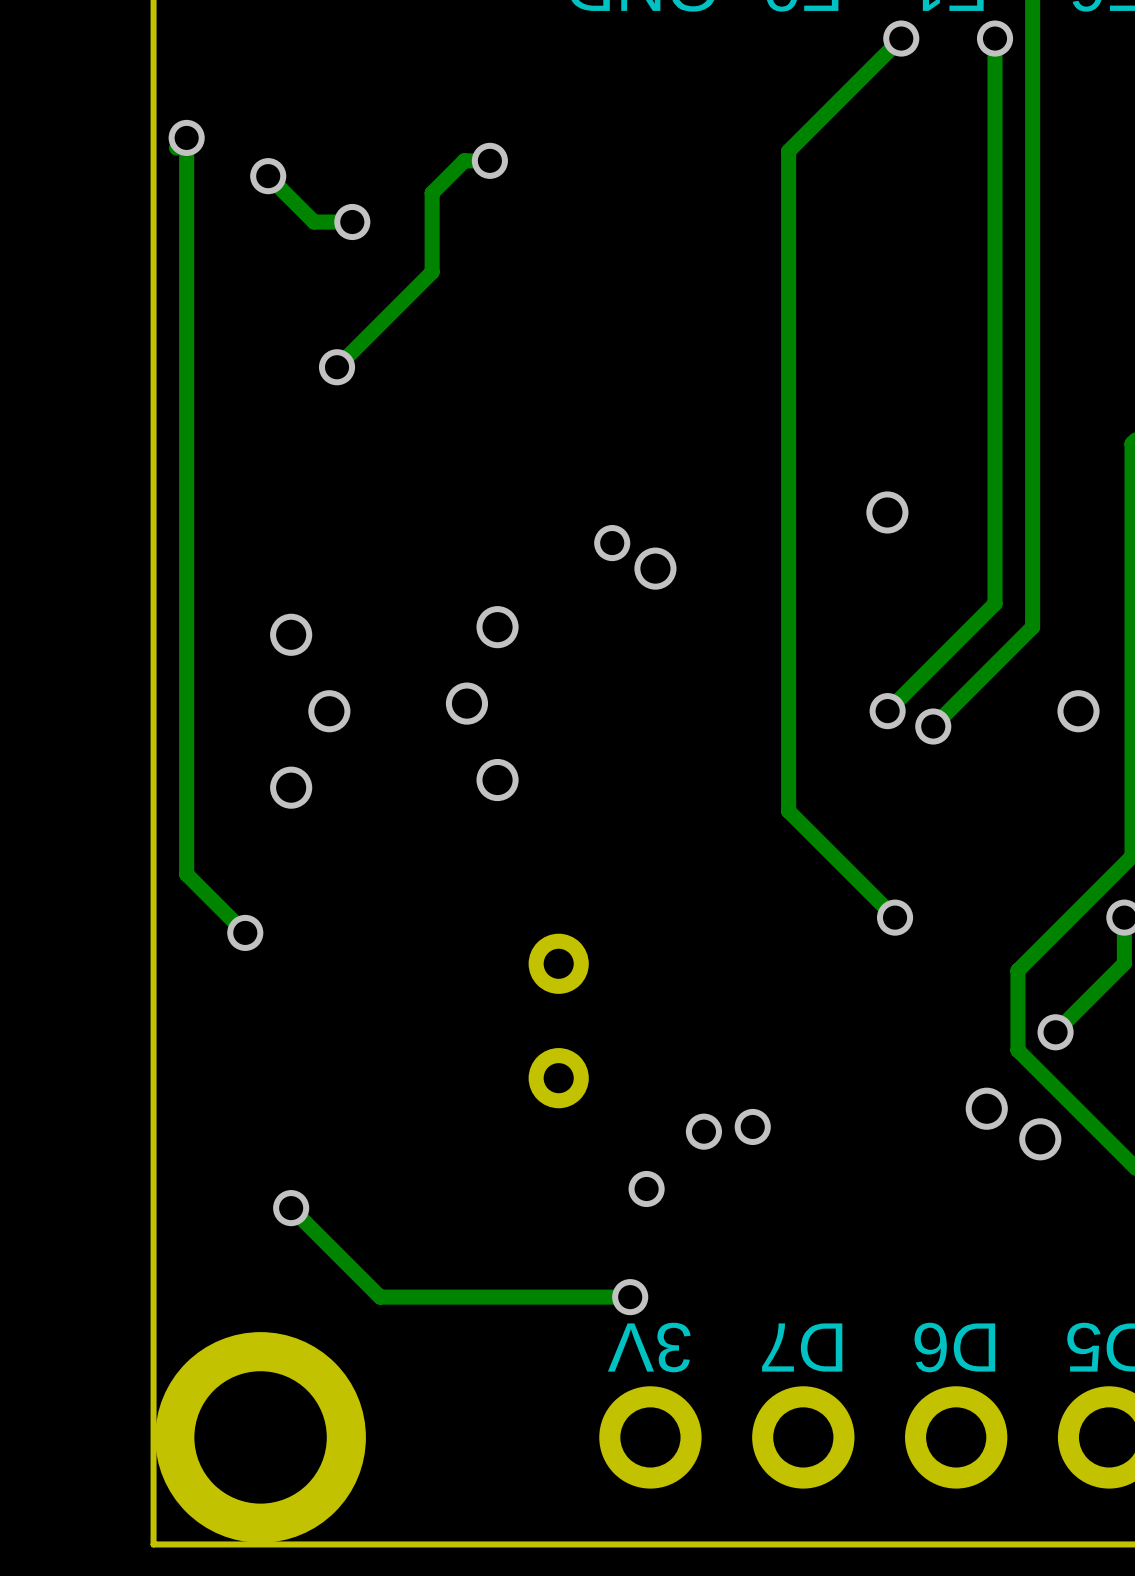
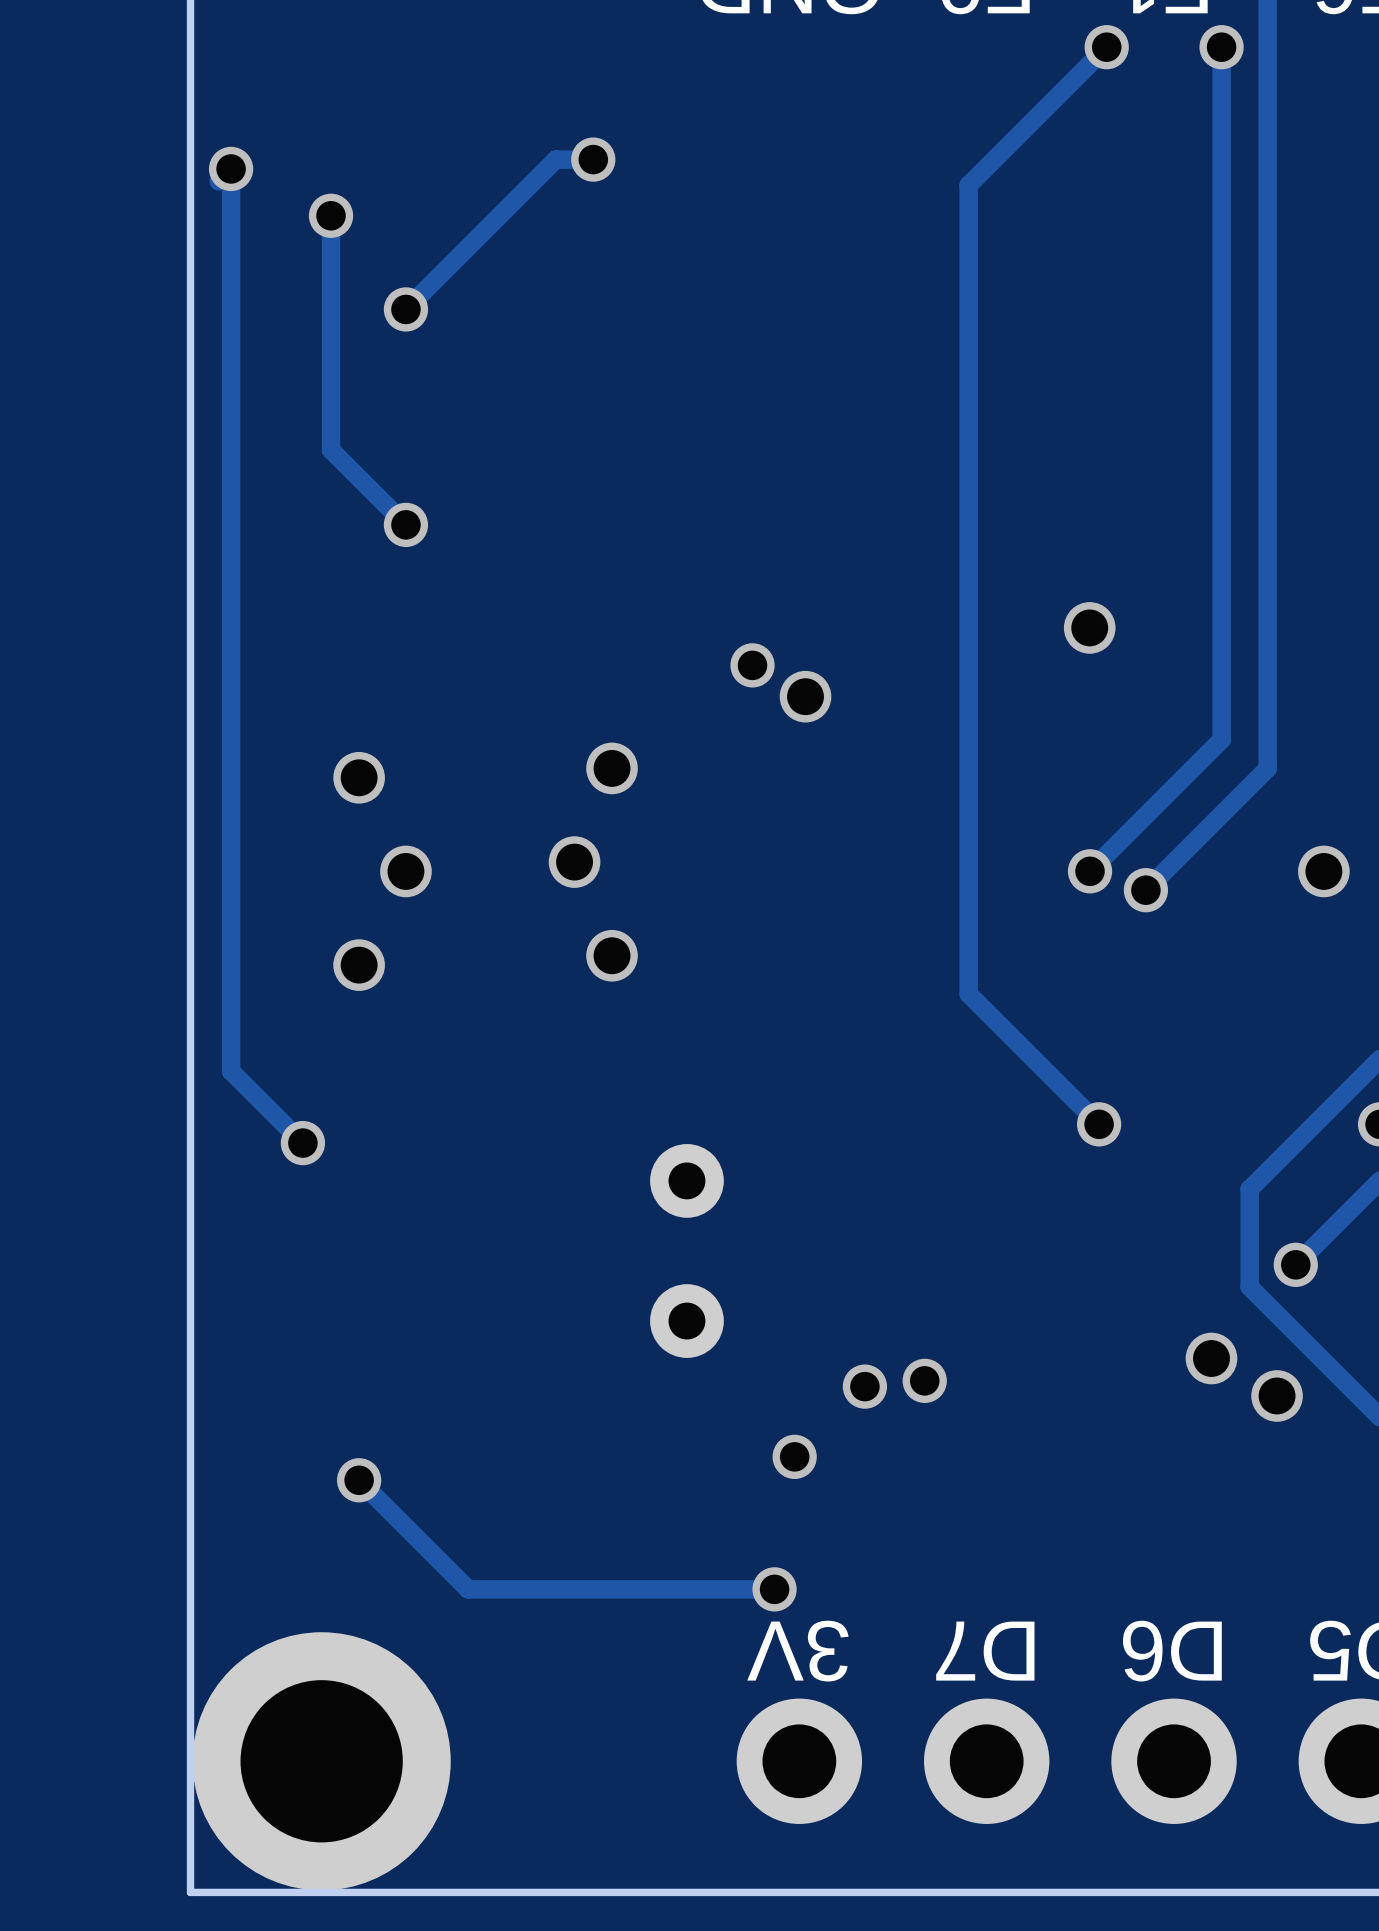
track: none -> (593, 159) (555, 159) (405, 309)
track: (489, 160) (464, 160) (432, 193) (432, 272) (337, 367) -> none
via position: (489, 160) -> (593, 159)
track: (268, 176) (314, 222) (352, 222) -> (331, 215) (331, 449) (405, 524)
via position: (352, 222) -> (405, 309)
via: (337, 367) -> none
via: none -> (405, 524)

